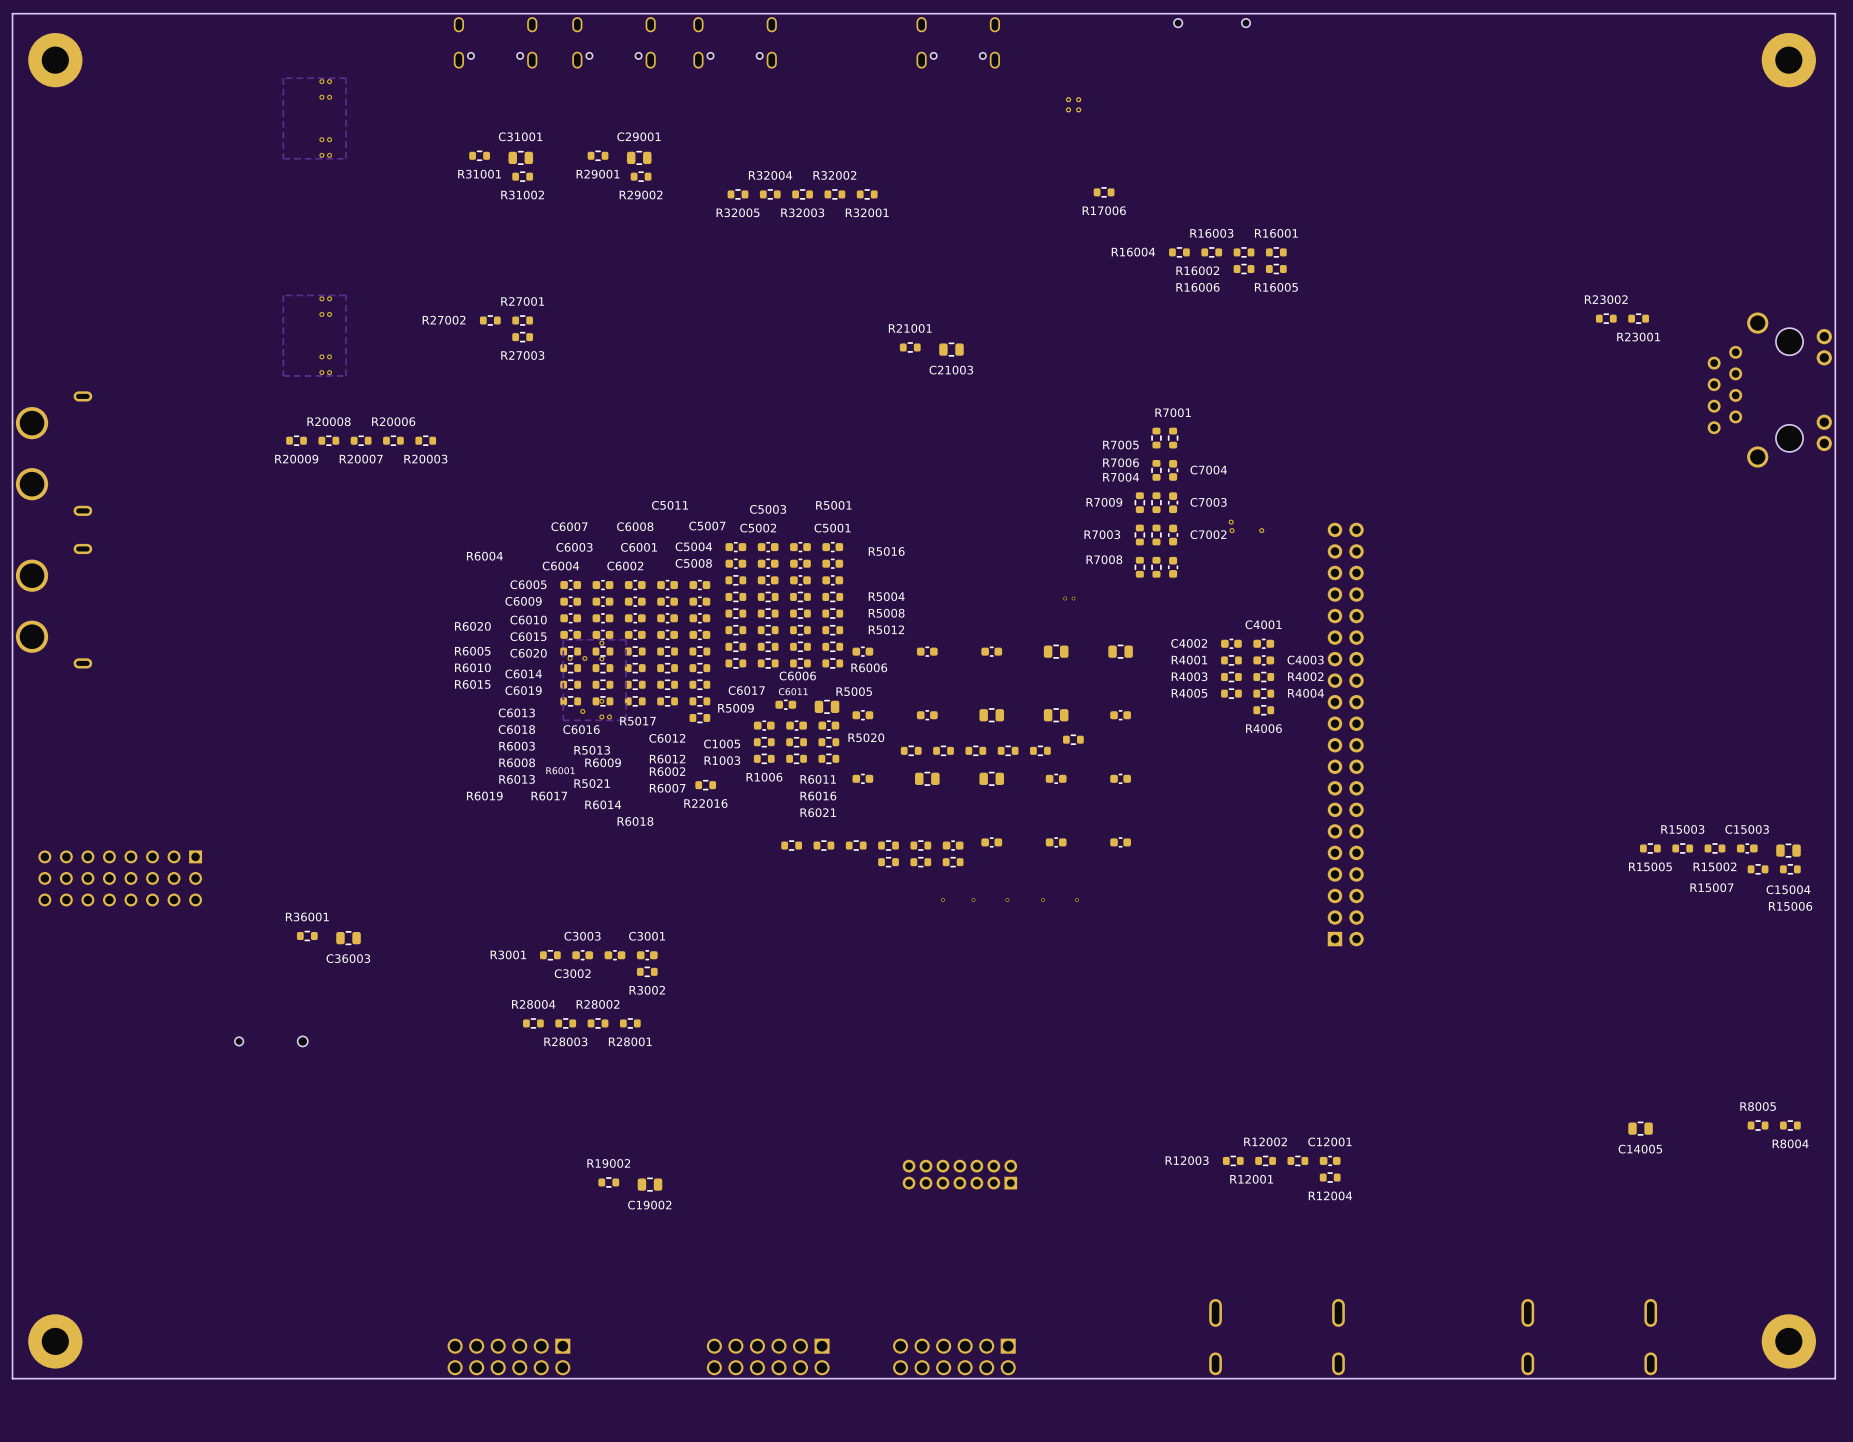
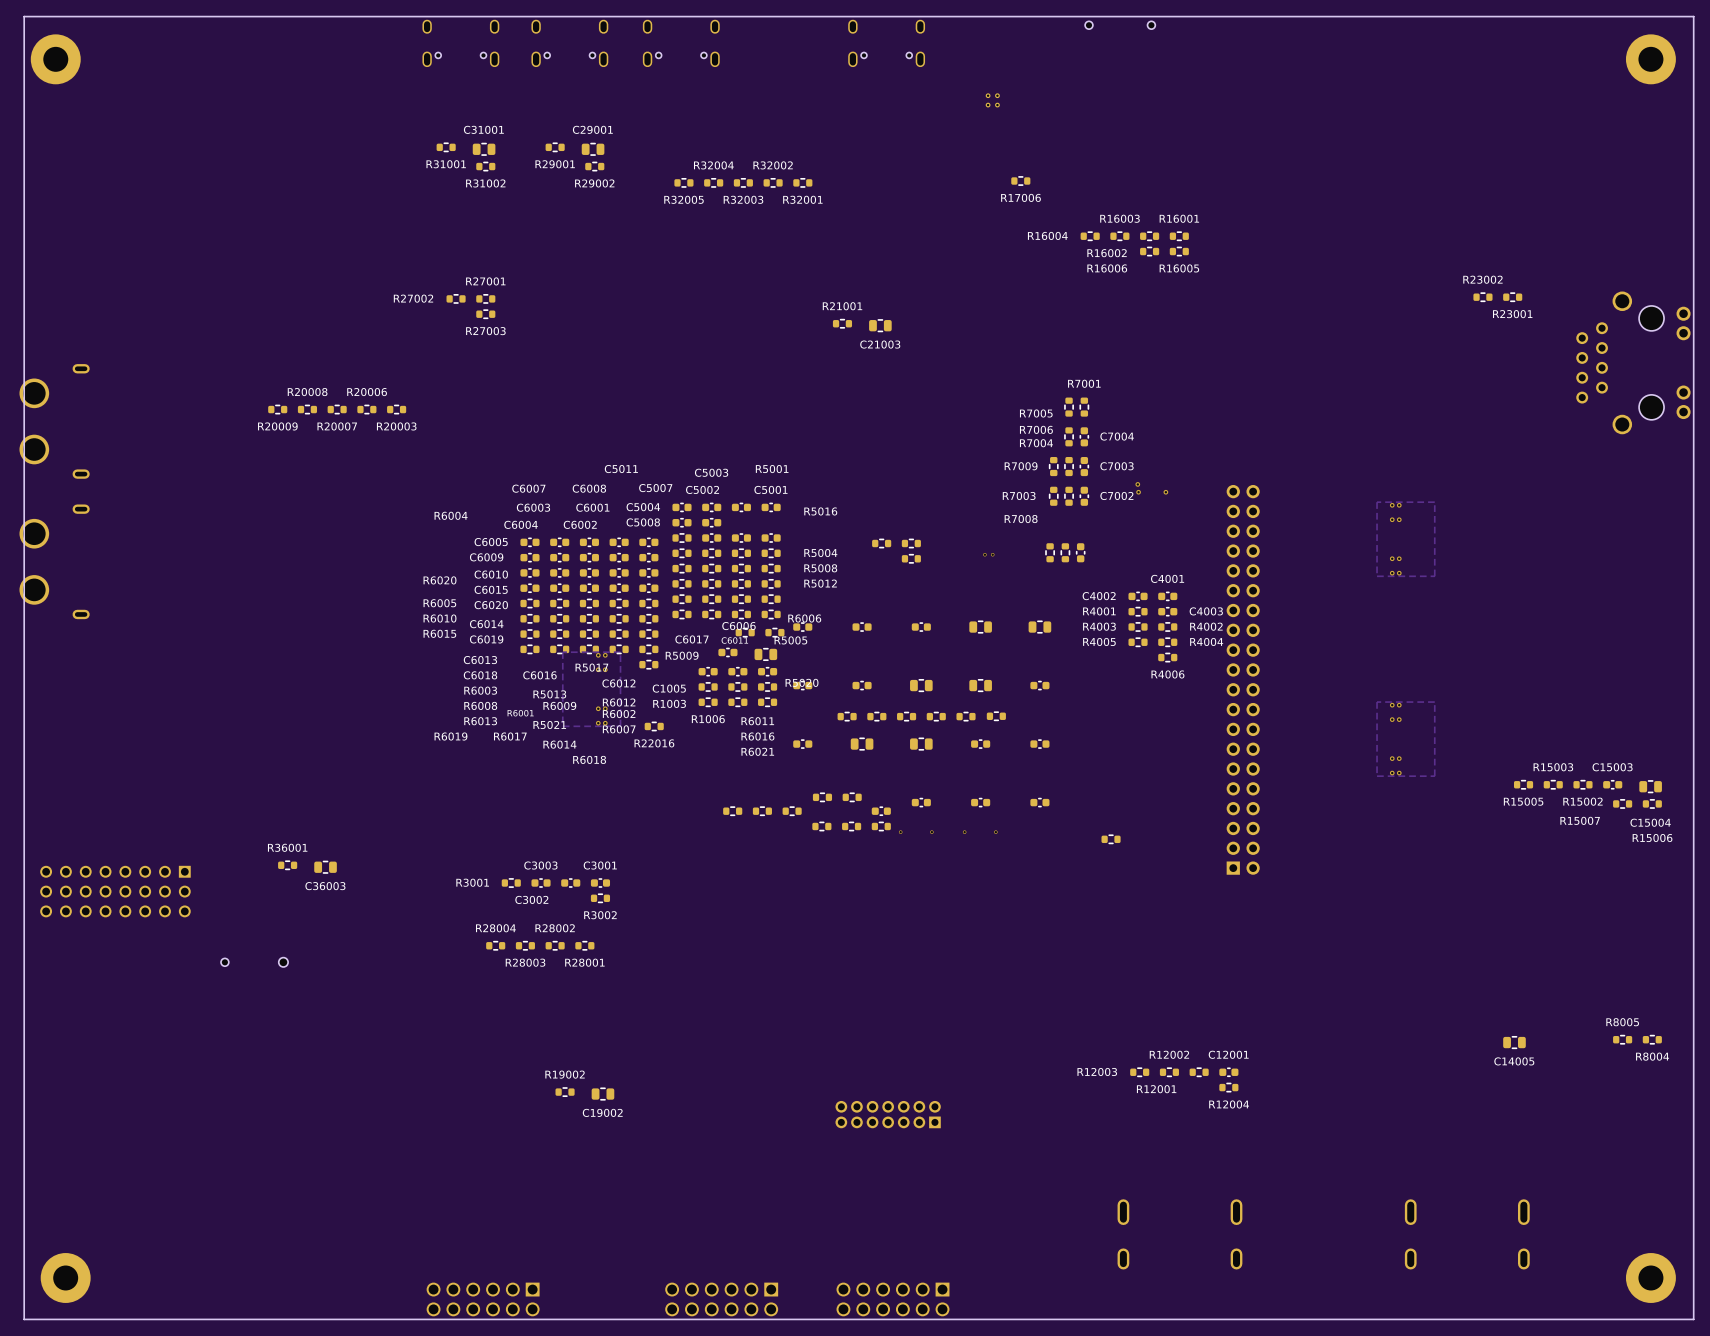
board edge: (21, 13) (12, 13) (12, 1378) (1835, 1378) -> (24, 16) (24, 1319) (1693, 1319) (1693, 1272)
zone outline: (346, 78) (346, 158) (283, 158) (283, 78) (346, 78) -> none
via: (321, 81) -> none
via: (329, 81) -> none
via: (321, 97) -> none
via: (329, 97) -> none
via: (321, 139) -> none
via: (329, 139) -> none
via: (321, 155) -> none
via: (329, 155) -> none
zone outline: (346, 295) (346, 375) (283, 375) (283, 295) (346, 295) -> none
via: (321, 298) -> none
via: (329, 298) -> none
via: (321, 314) -> none
via: (329, 314) -> none
via: (321, 356) -> none
via: (329, 356) -> none
via: (321, 372) -> none
via: (329, 372) -> none
zone outline: none -> (1434, 502) (1377, 502) (1377, 576) (1434, 576) (1434, 502)
via: none -> (1392, 505)
via: none -> (1399, 505)
via: none -> (1392, 519)
via: none -> (1399, 519)
part: (800, 563) -> none
part: (832, 563) -> none
part: (1139, 567) -> none
part: (1156, 567) -> none
part position: (1173, 567) -> (1080, 552)
part: none -> (881, 543)
part: none -> (911, 543)
part: none -> (1050, 552)
part: none -> (1065, 552)
part: none -> (911, 558)
via: none -> (1392, 558)
via: none -> (1399, 558)
via: none -> (1392, 573)
via: none -> (1399, 573)
zone outline: (626, 639) (626, 720) (563, 720) (563, 639) (626, 639) -> (620, 652) (620, 726) (562, 726) (562, 652) (620, 652)
via: (601, 643) -> none
part: (862, 651) -> none
part: (927, 651) -> none
part position: (991, 651) -> (921, 627)
part: (1056, 651) -> none
part position: (1120, 651) -> (1039, 627)
via: (570, 658) -> none
via: (584, 658) -> none
via: (601, 658) -> none
part: none -> (802, 627)
part: none -> (862, 627)
part: none -> (980, 627)
part: none -> (745, 632)
part: none -> (774, 632)
via: (601, 701) -> none
via: none -> (598, 655)
via: none -> (605, 655)
via: (582, 711) -> none
part: (862, 715) -> none
part: (927, 715) -> none
part: (991, 715) -> none
part: (1056, 715) -> none
part: (1120, 715) -> none
via: (601, 716) -> none
via: (609, 716) -> none
via: none -> (598, 669)
via: none -> (605, 669)
part: (1073, 739) -> none
part: none -> (802, 685)
part: none -> (862, 685)
part: none -> (921, 685)
part: none -> (980, 685)
part: none -> (1039, 685)
part: (911, 750) -> none
part: (943, 750) -> none
part: (975, 750) -> none
part: (1008, 750) -> none
part: (1040, 750) -> none
zone outline: none -> (1434, 702) (1434, 776) (1377, 776) (1377, 702) (1434, 702)
via: none -> (1392, 705)
via: none -> (1399, 705)
via: none -> (598, 708)
via: none -> (605, 708)
part: none -> (847, 716)
part: none -> (876, 716)
part: none -> (906, 716)
part: none -> (936, 716)
part: none -> (966, 716)
part: none -> (996, 716)
via: none -> (1392, 719)
via: none -> (1399, 719)
part: (862, 778) -> none
part position: (927, 778) -> (862, 744)
part: (991, 778) -> none
part: (1056, 778) -> none
part: (1120, 778) -> none
via: none -> (598, 723)
via: none -> (605, 723)
part: none -> (802, 744)
part: none -> (921, 744)
part: none -> (980, 744)
part: none -> (1039, 744)
via: none -> (1392, 758)
via: none -> (1399, 758)
via: none -> (1392, 773)
via: none -> (1399, 773)
part: (991, 842) -> none
part: (1056, 842) -> none
part: (1120, 842) -> none
part: (791, 845) -> none
part: (823, 845) -> none
part: (856, 845) -> none
part: (888, 845) -> none
part: (920, 845) -> none
part: (953, 845) -> none
part: (953, 862) -> none
part: none -> (921, 802)
part: none -> (980, 802)
part: none -> (1039, 802)
part: none -> (732, 811)
part: none -> (762, 811)
part: none -> (792, 811)
part: none -> (881, 811)
part position: (120, 878) -> (115, 891)
part: none -> (821, 826)
part: none -> (851, 826)
part: none -> (881, 826)
via: (942, 899) -> none
part: none -> (1111, 839)
part position: (959, 1174) -> (888, 1114)
part position: (55, 1341) -> (65, 1278)
part position: (1788, 1341) -> (1650, 1278)
part position: (508, 1356) -> (483, 1299)
part position: (768, 1356) -> (721, 1299)
part position: (954, 1356) -> (892, 1299)

